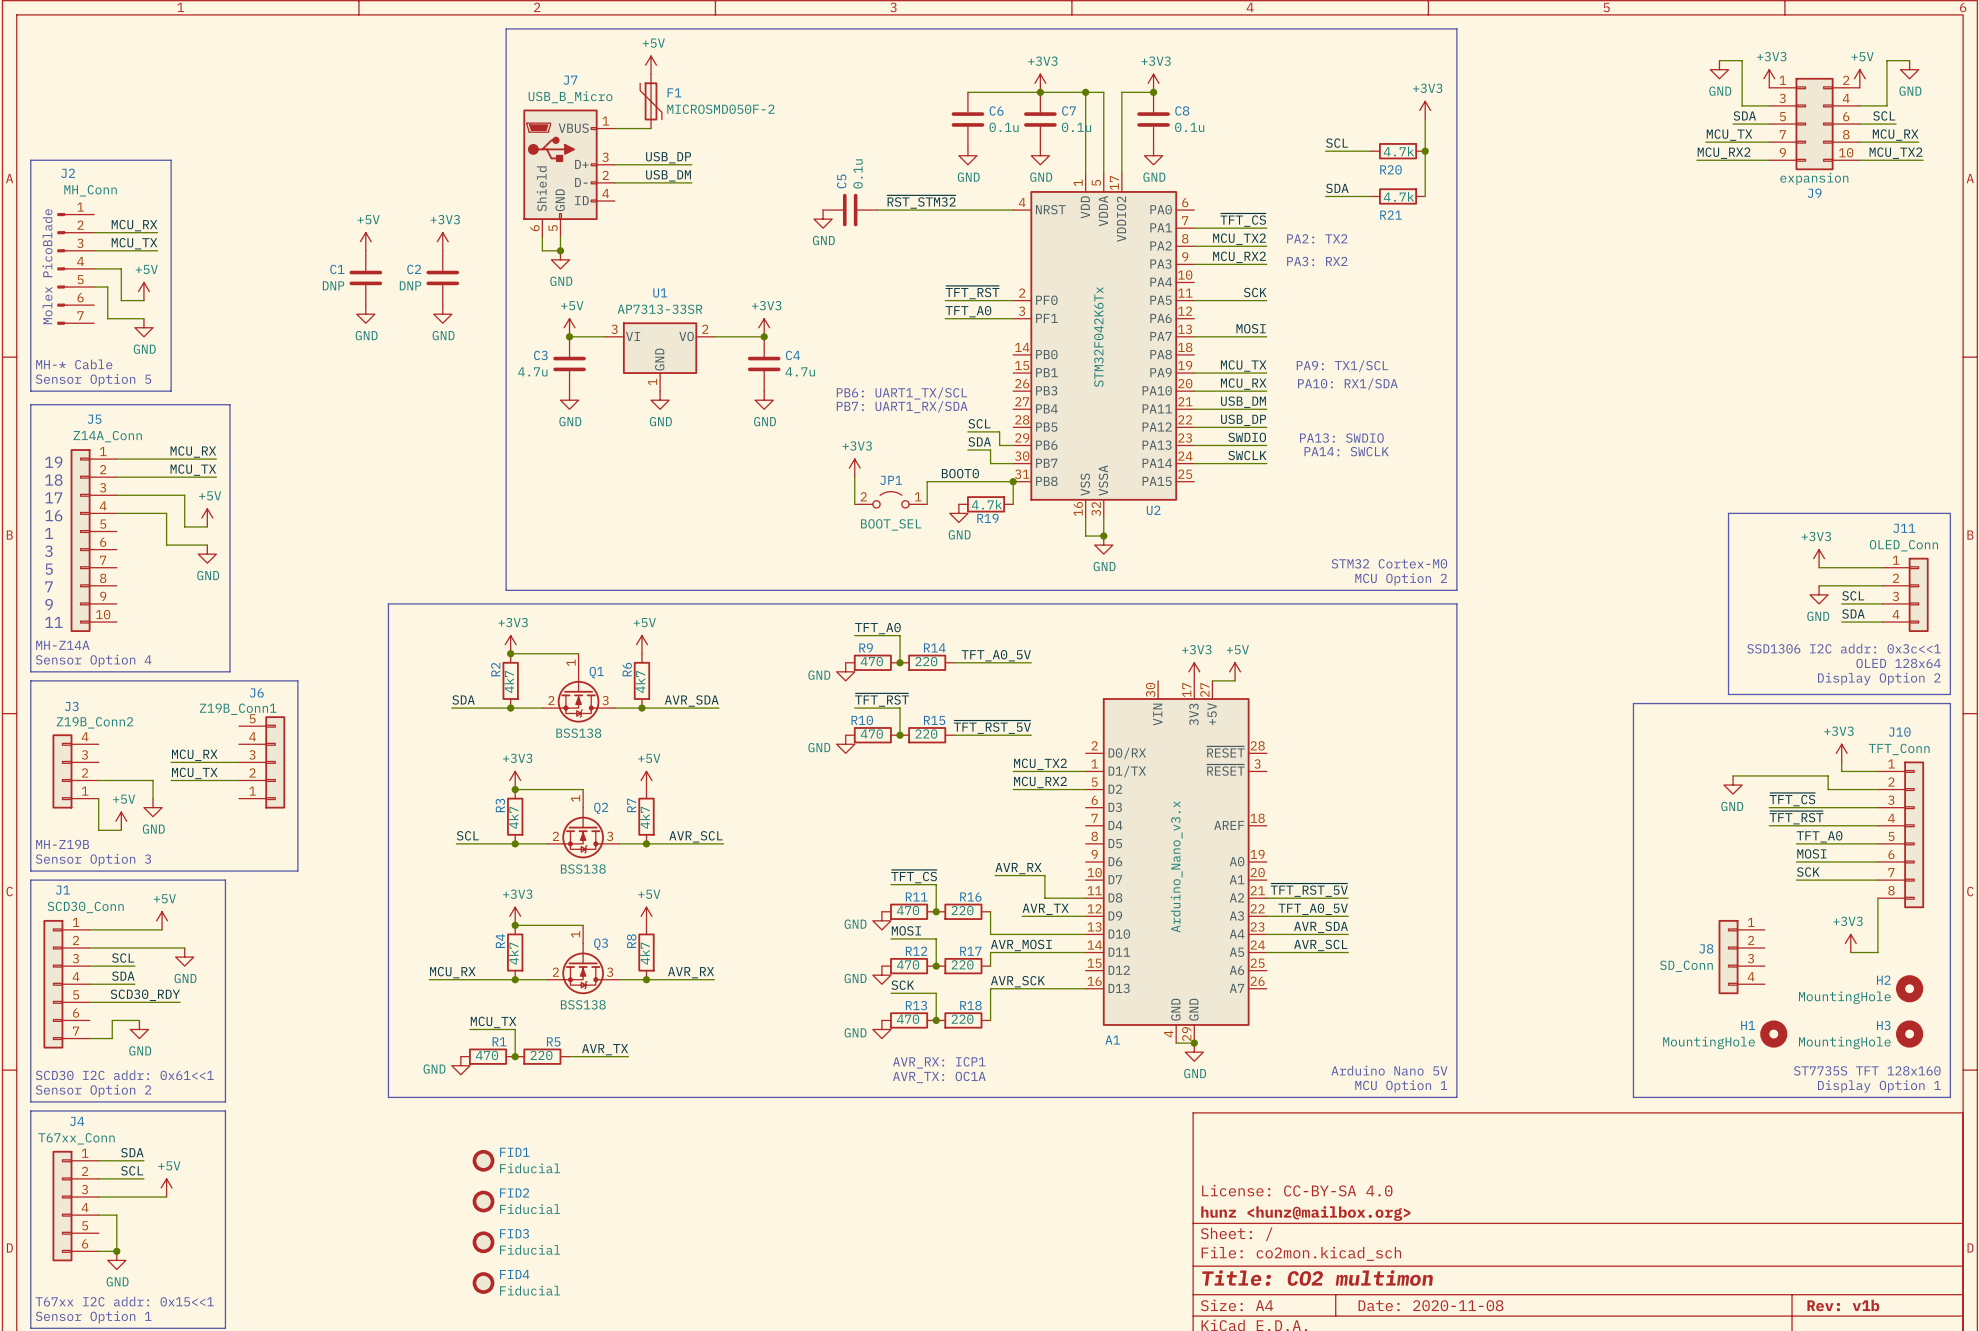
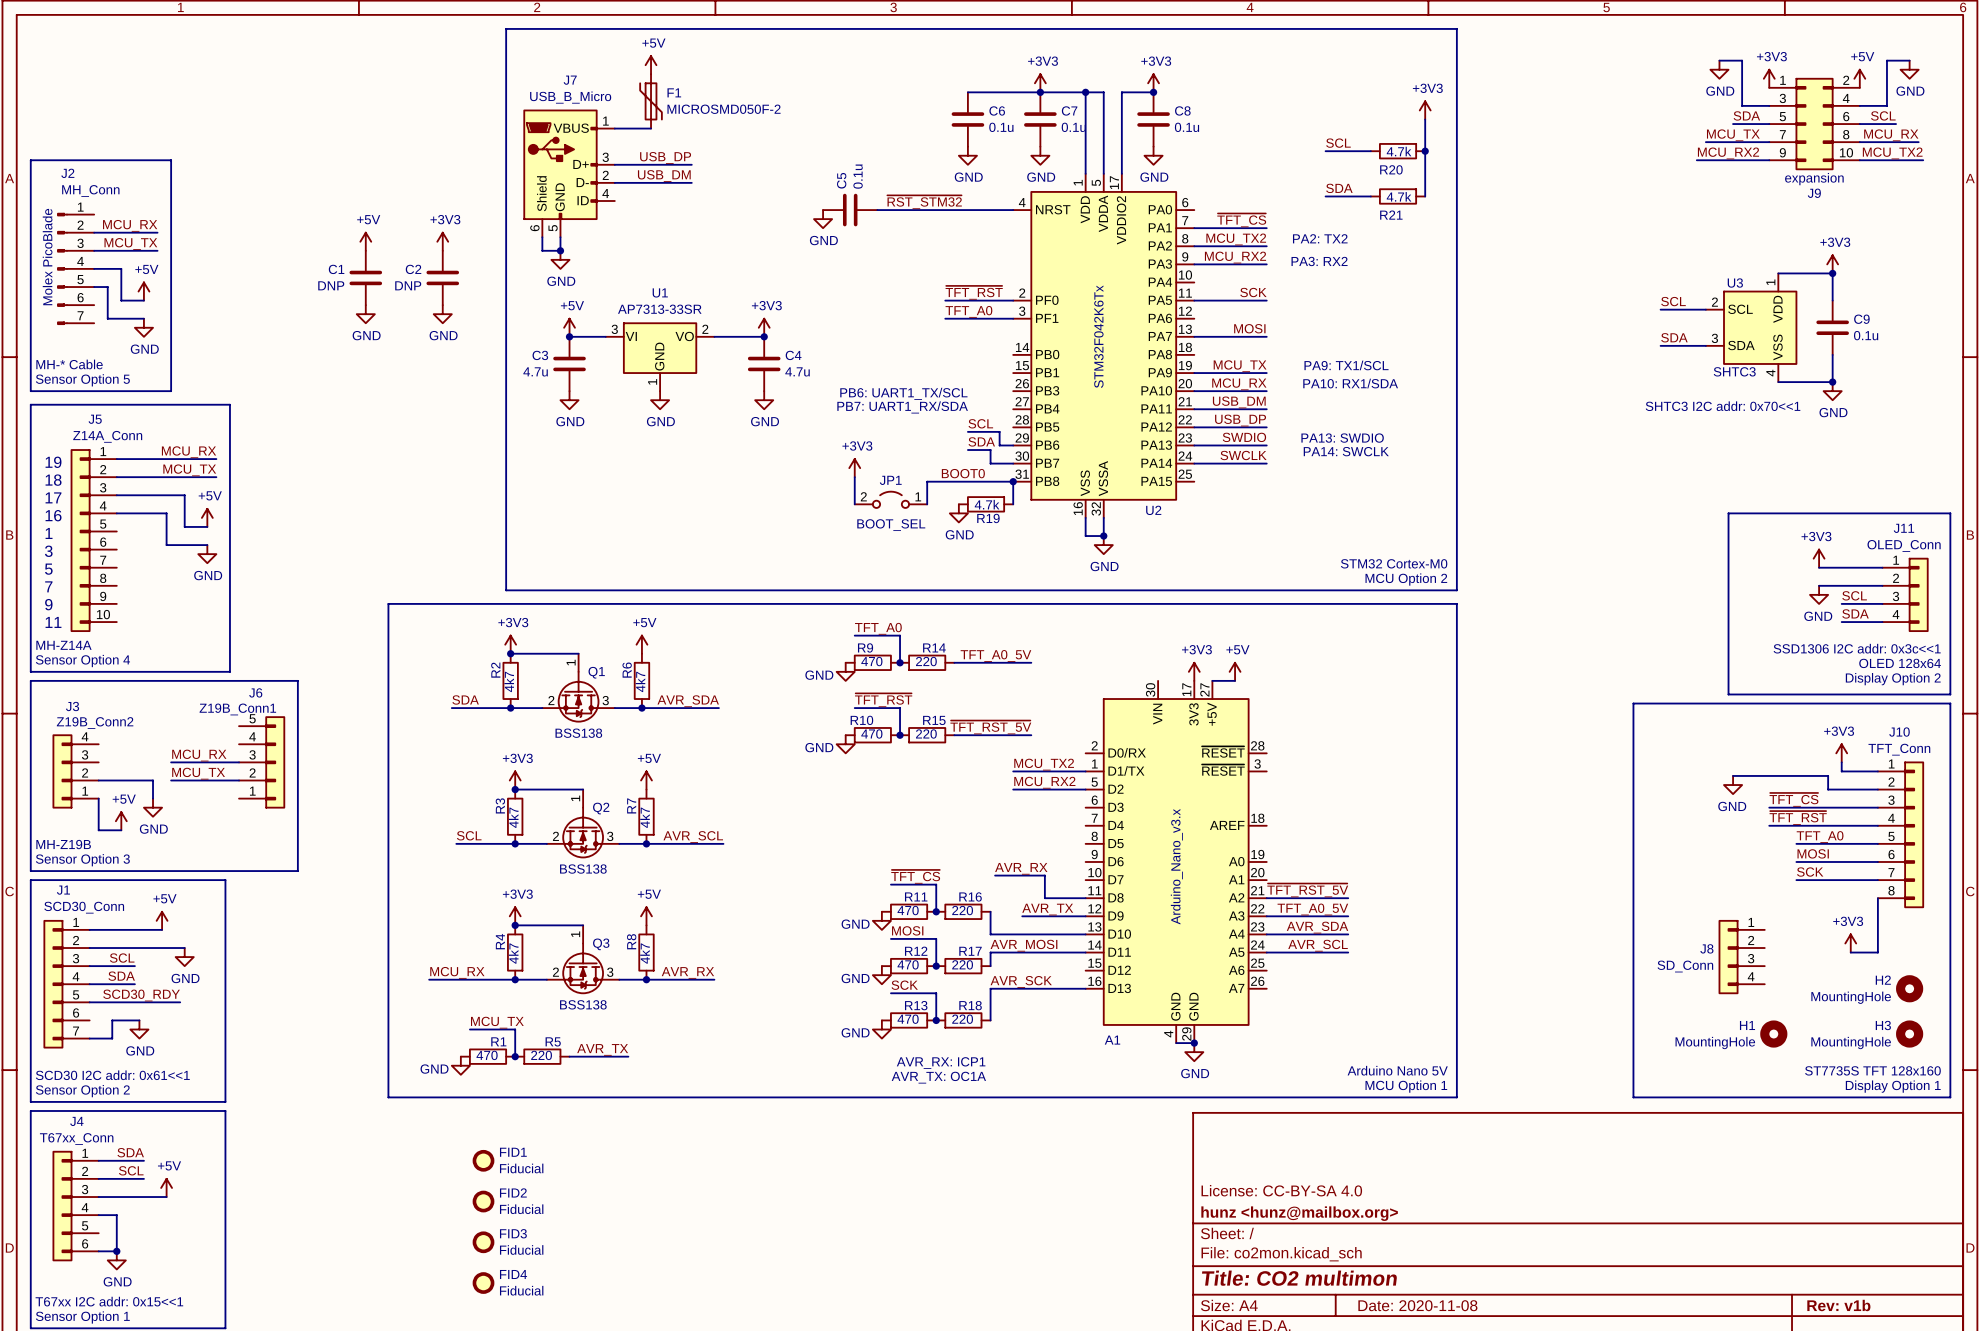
power symbol: none -> +3V3 (1832, 264)
wire: none -> (1778, 273) (1832, 273) (1832, 300)
junction: none -> (1832, 273)
label: none -> SCL (1673, 301)
wire: none -> (1660, 309) (1705, 309)
U3: none -> SHTC3 (1751, 327)
C9: none -> 0.1u (1832, 327)
label: none -> SDA (1674, 337)
wire: none -> (1660, 345) (1705, 345)
wire: none -> (1832, 354) (1832, 382) (1778, 382)
junction: none -> (1832, 382)
power symbol: none -> GND (1832, 391)
text: none -> SHTC3 I2C addr: 0x70<<1 (1723, 406)

